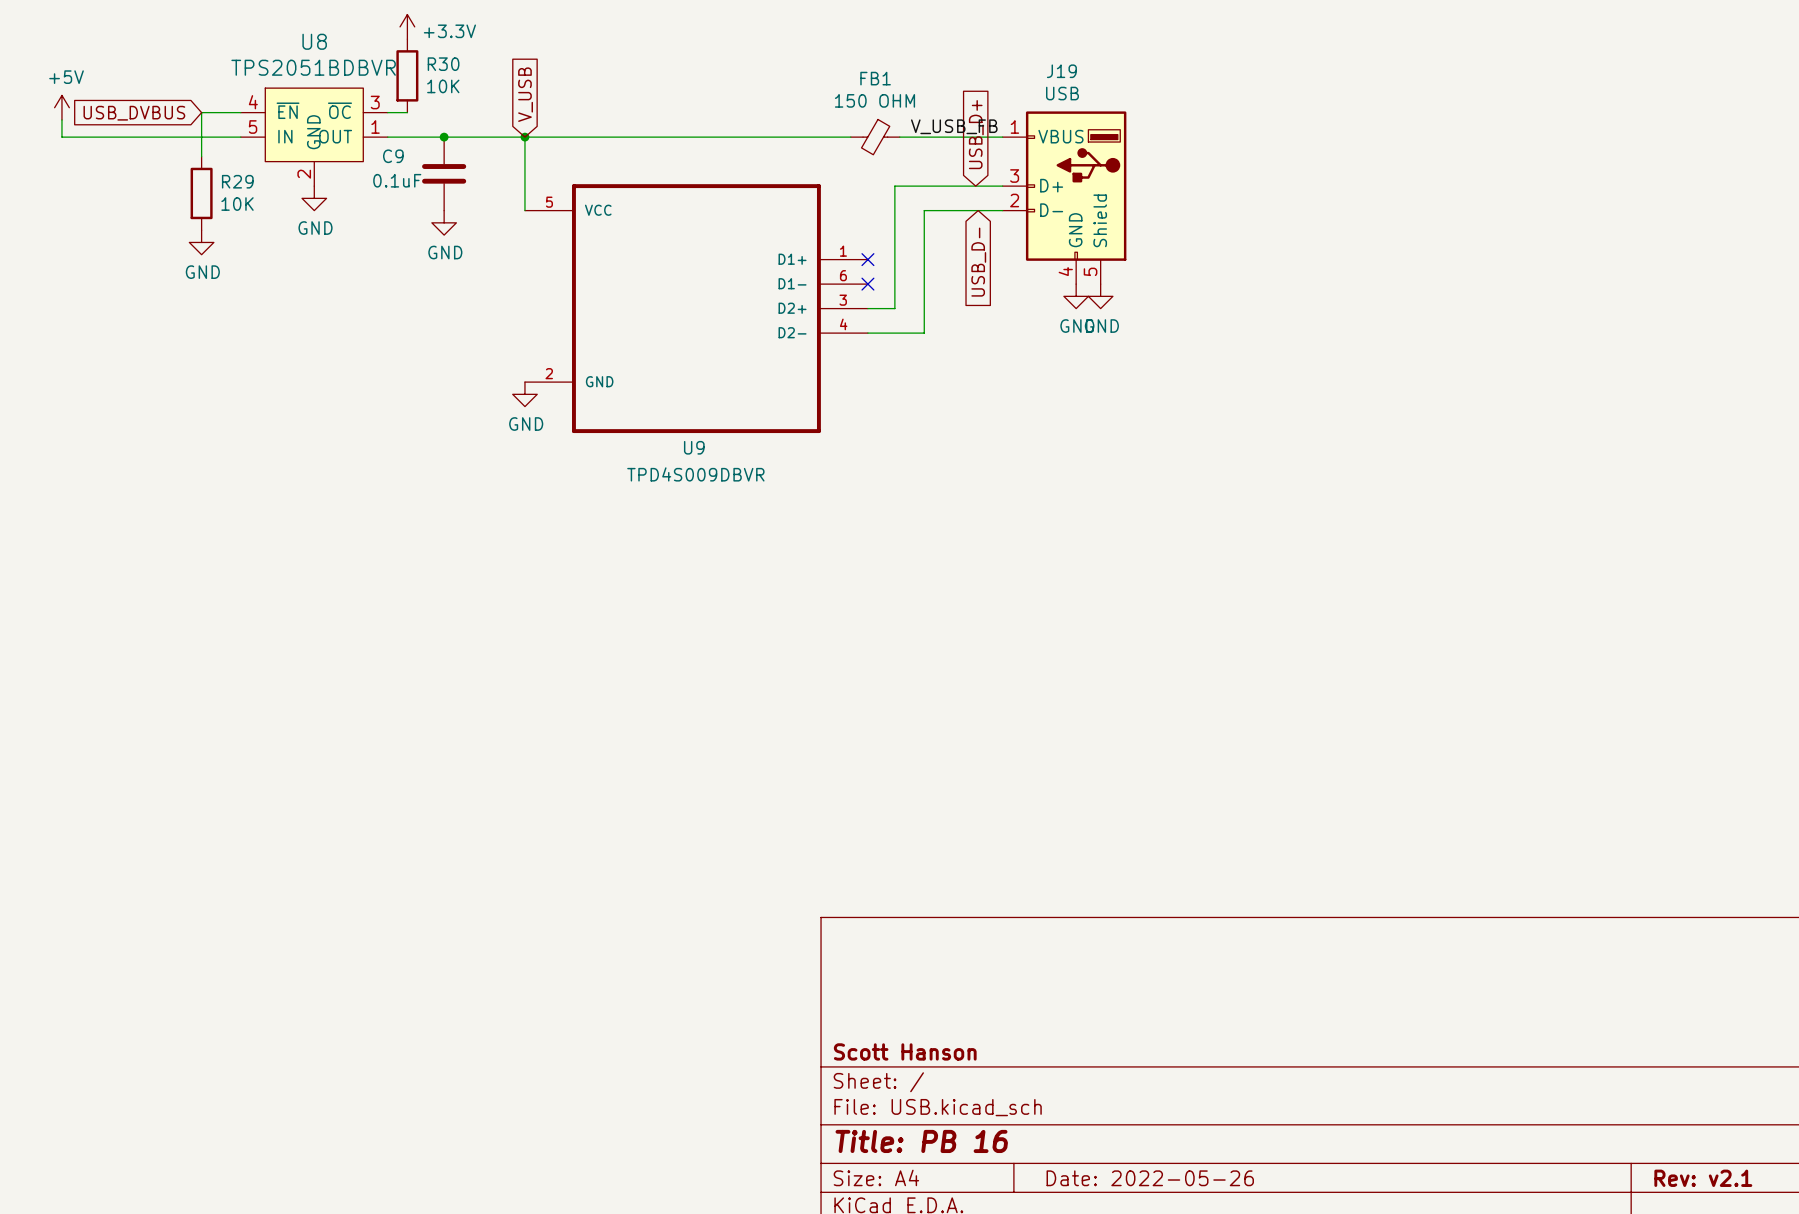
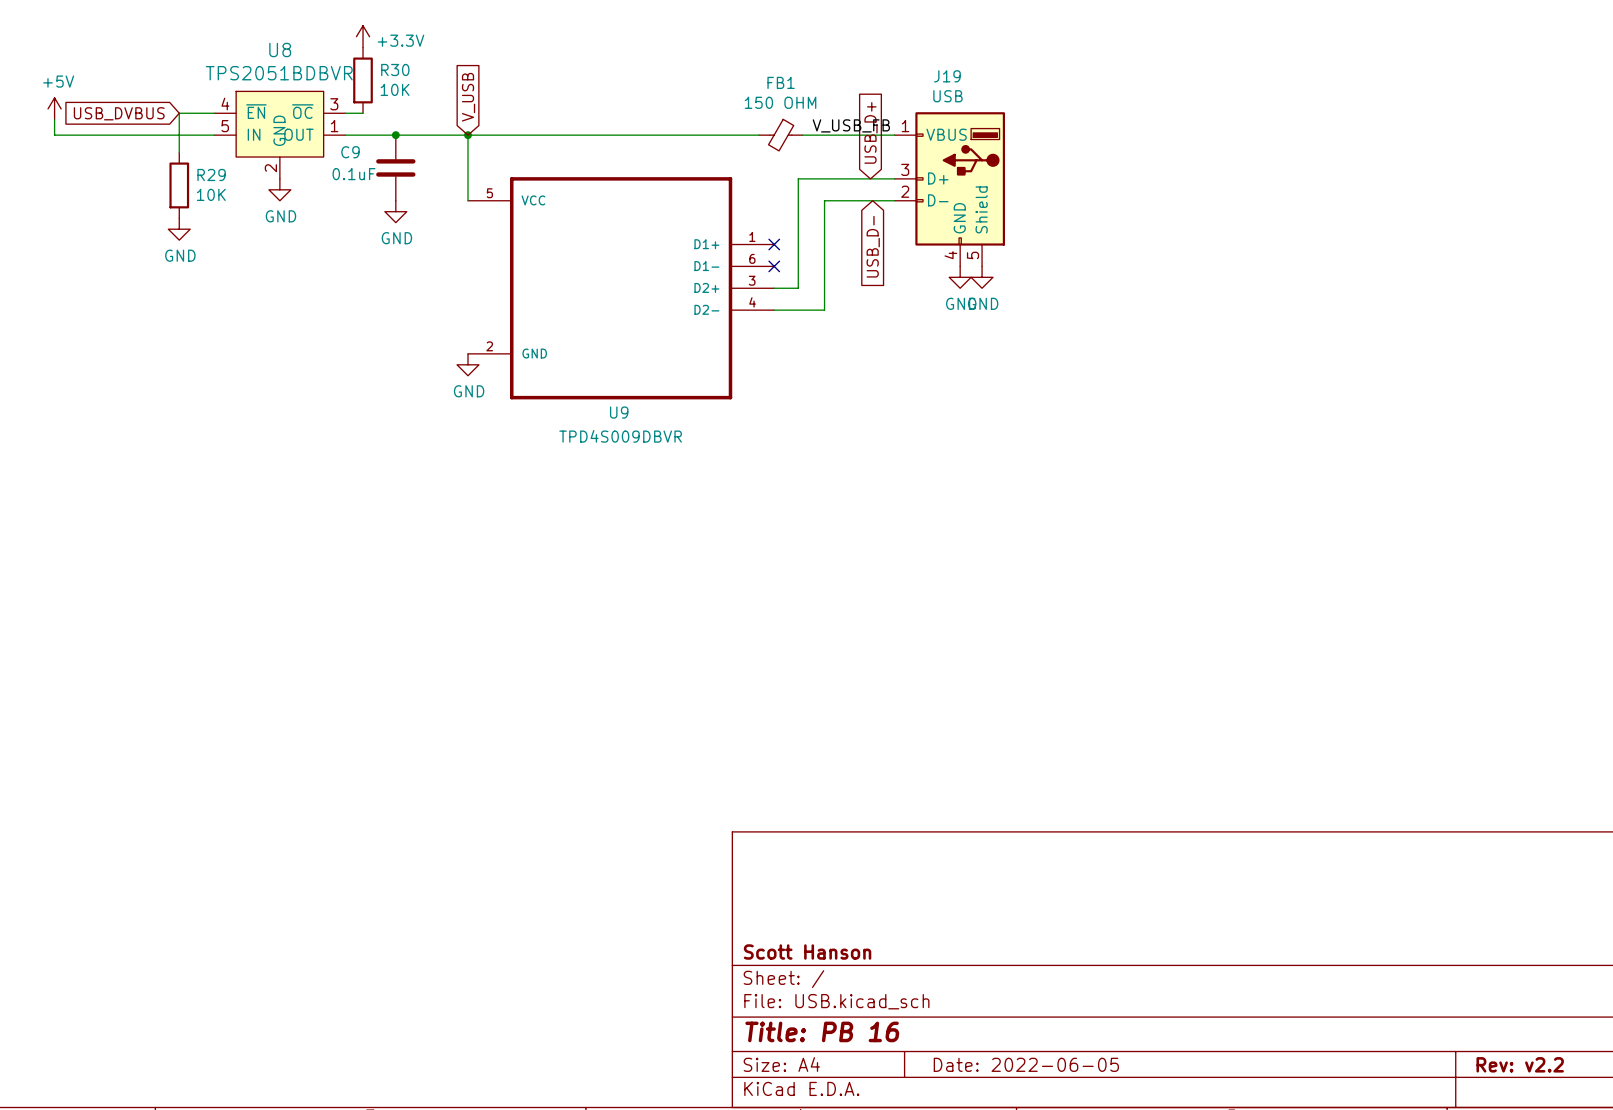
title block: Date: 2022-05-26 (1150, 1178) -> Date: 2022-06-05 (1026, 1064)
title block: Rev: v2.1 (1703, 1178) -> Rev: v2.2 (1520, 1064)

